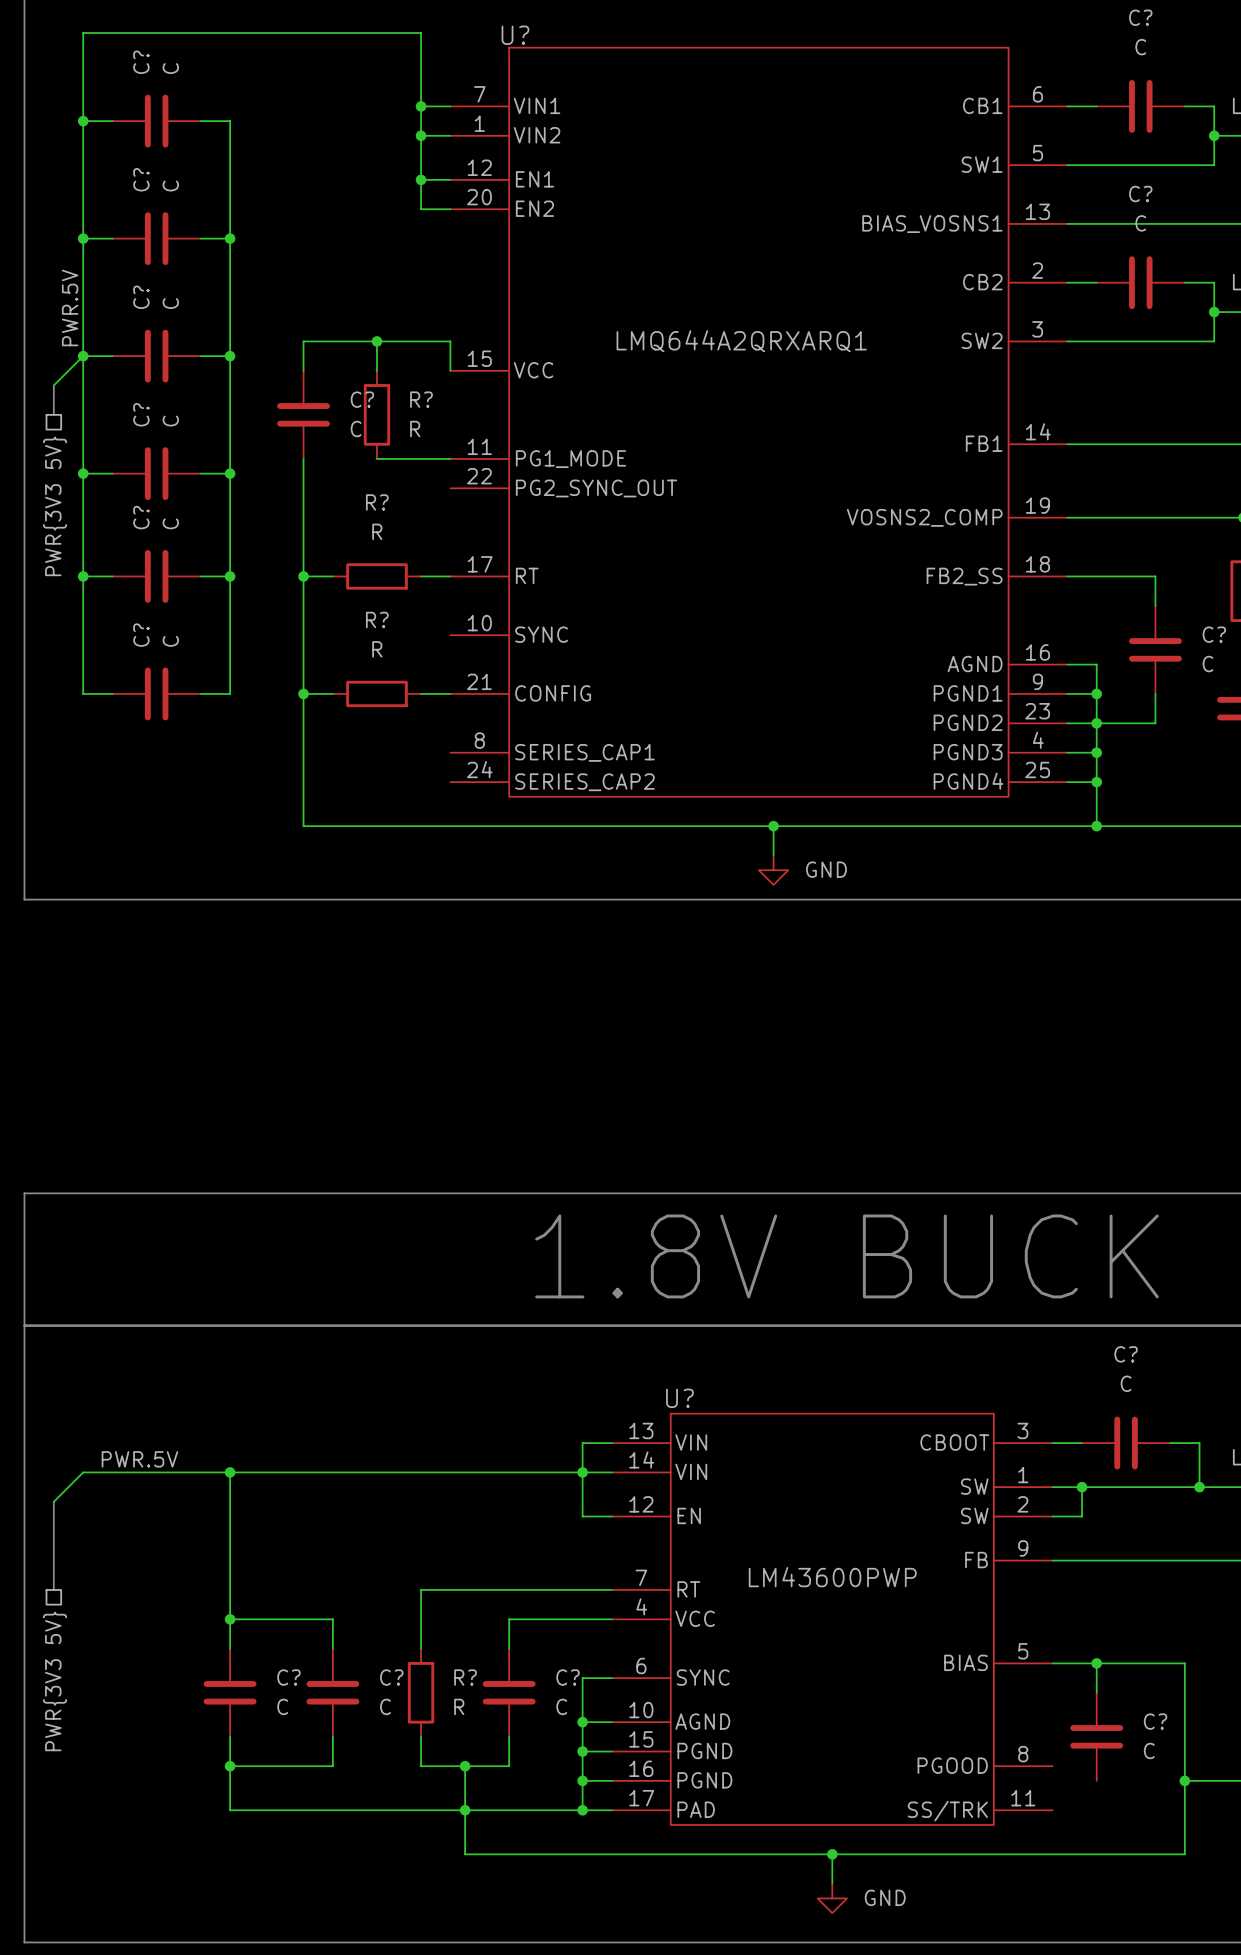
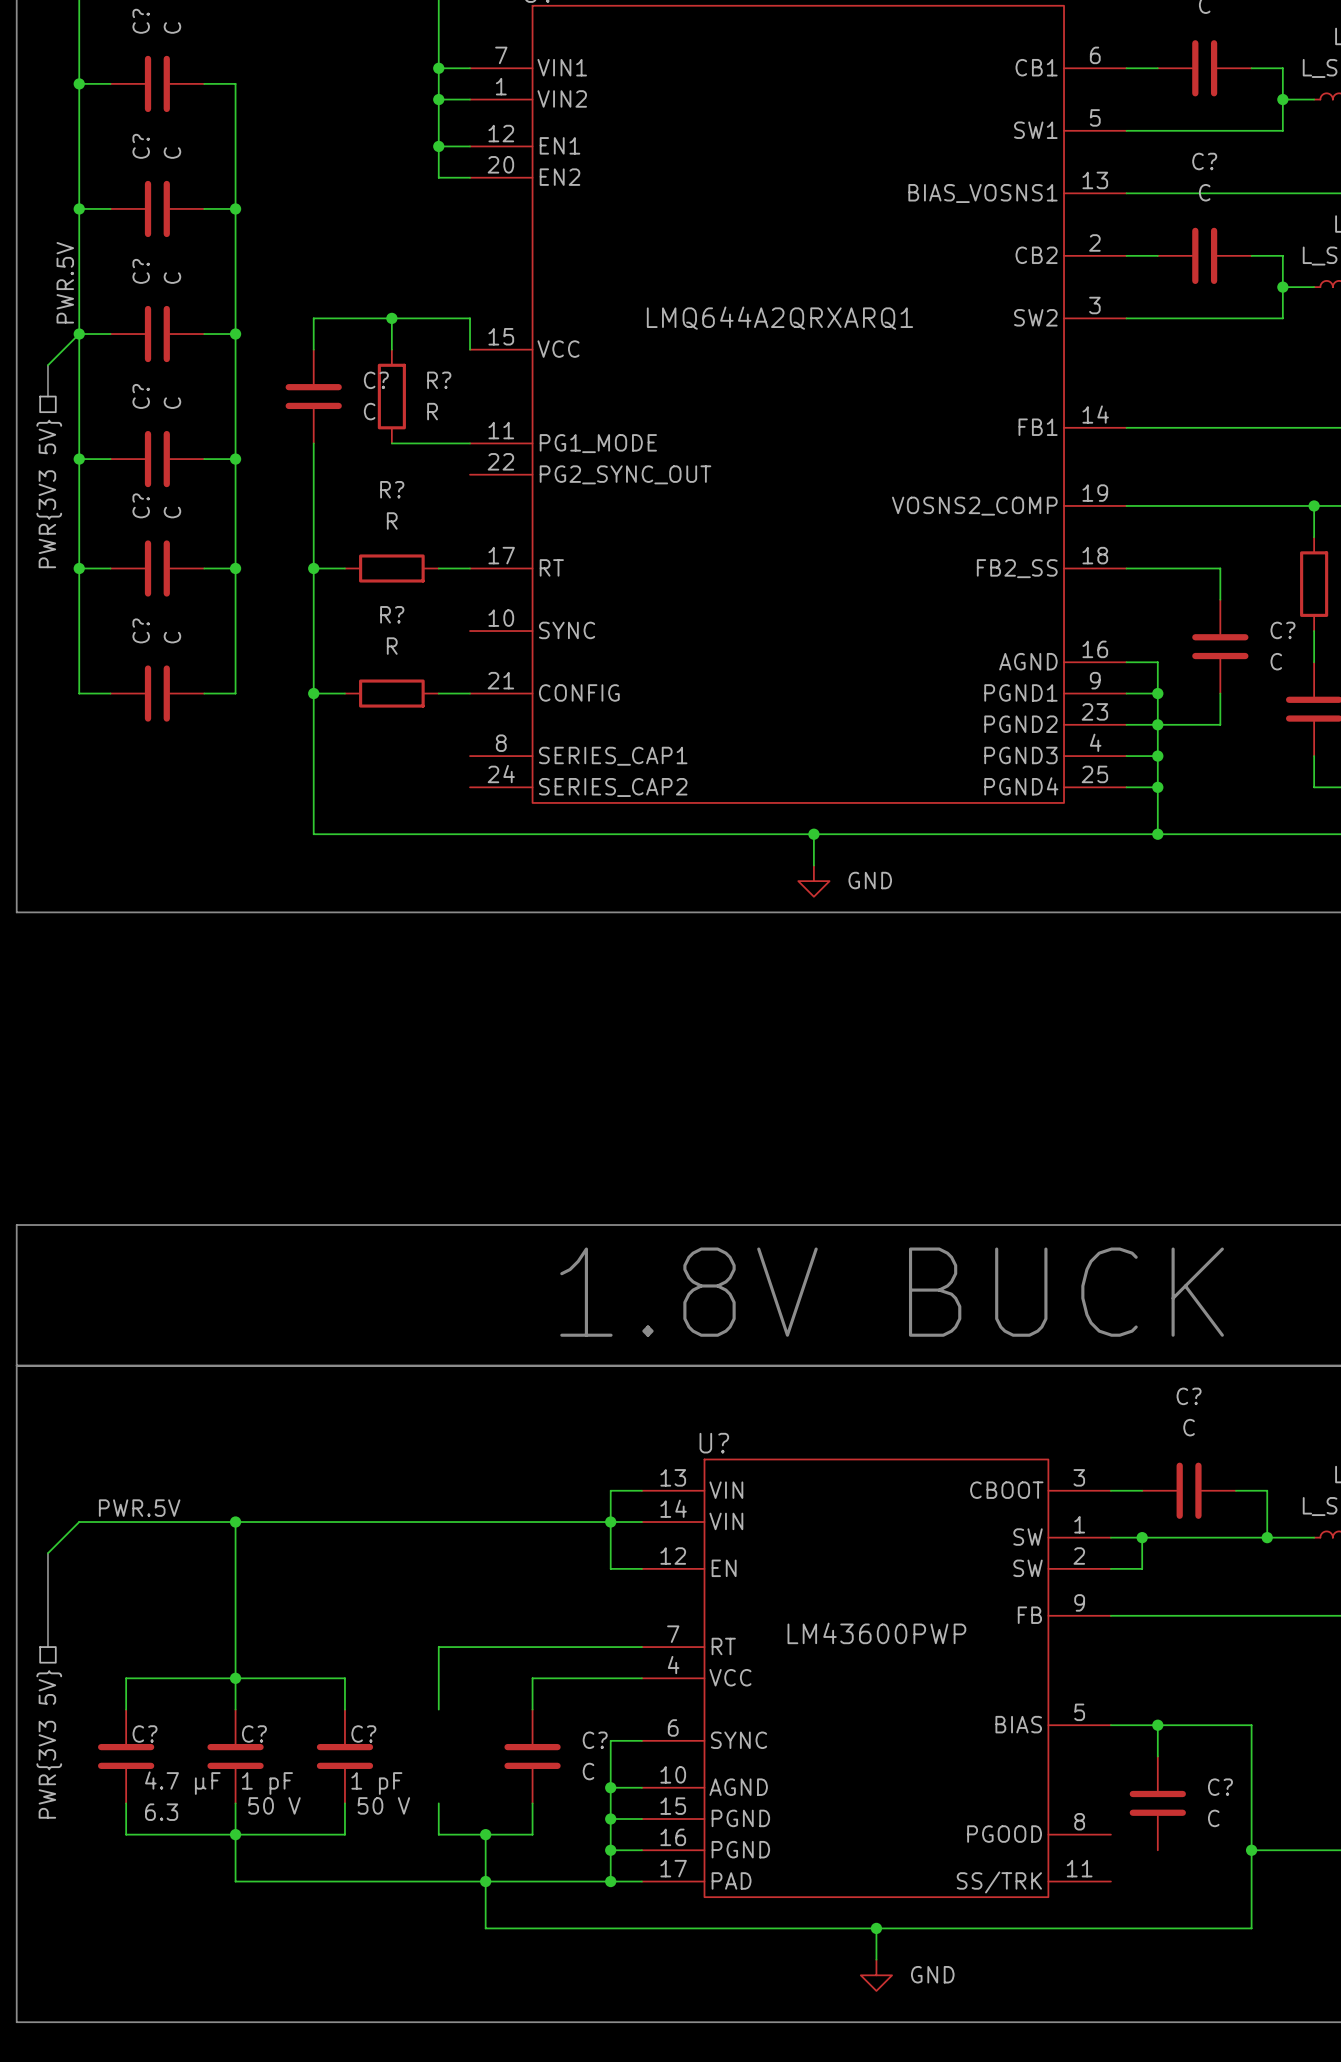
wire: none -> (235, 1678) (126, 1678) (126, 1709)
C? name position: C? (288, 1677) -> C? (254, 1734)
C? name position: C? (391, 1677) -> C? (363, 1734)
C?: none -> (126, 1756)
R?: R (421, 1692) -> none
C? value: C (282, 1706) -> none
C? value: C (385, 1706) -> none
C? text: none -> 1 pF (267, 1783)
C? text: none -> 1 pF (376, 1783)
wire: none -> (126, 1803) (126, 1834) (235, 1834)
C? text: none -> 50 V (274, 1805)
C? text: none -> 50 V (383, 1805)

